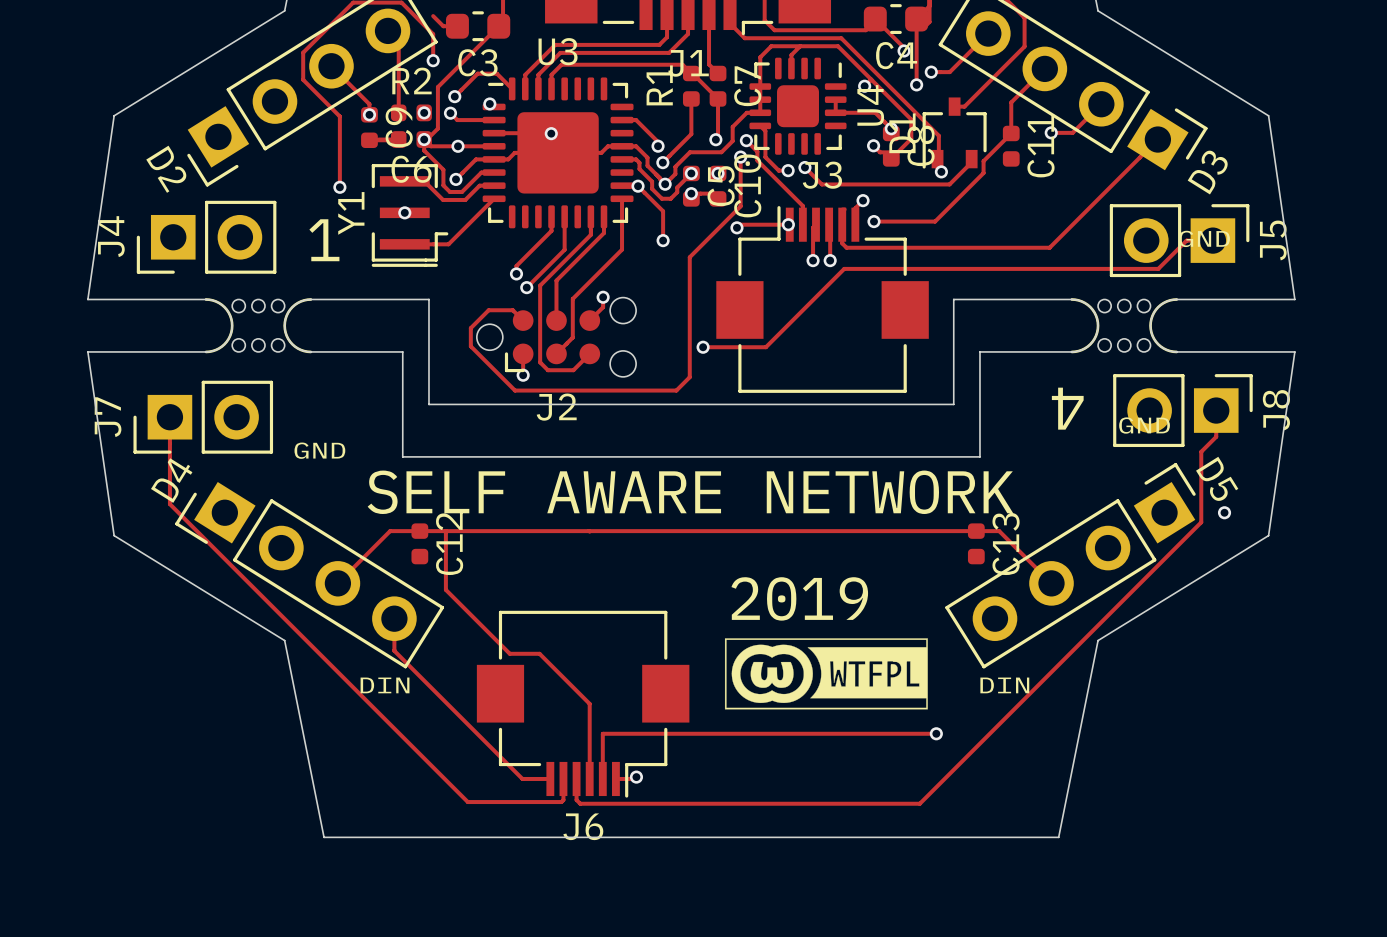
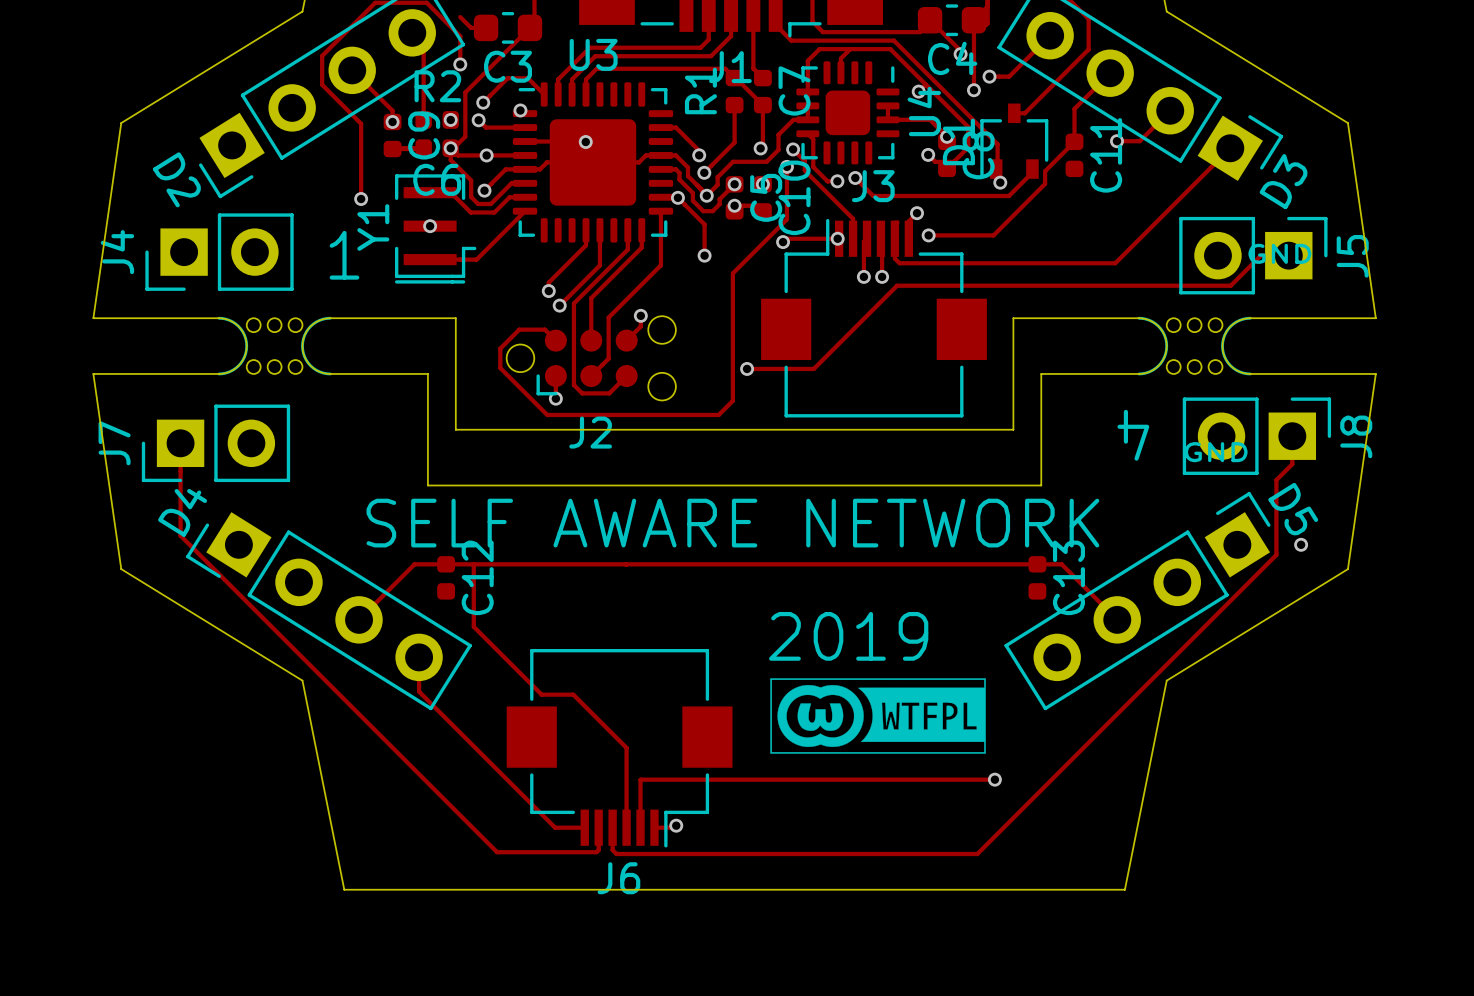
text: GND (319, 450) -> none
text: DIN (385, 685) -> none
text: DIN (1004, 685) -> none

